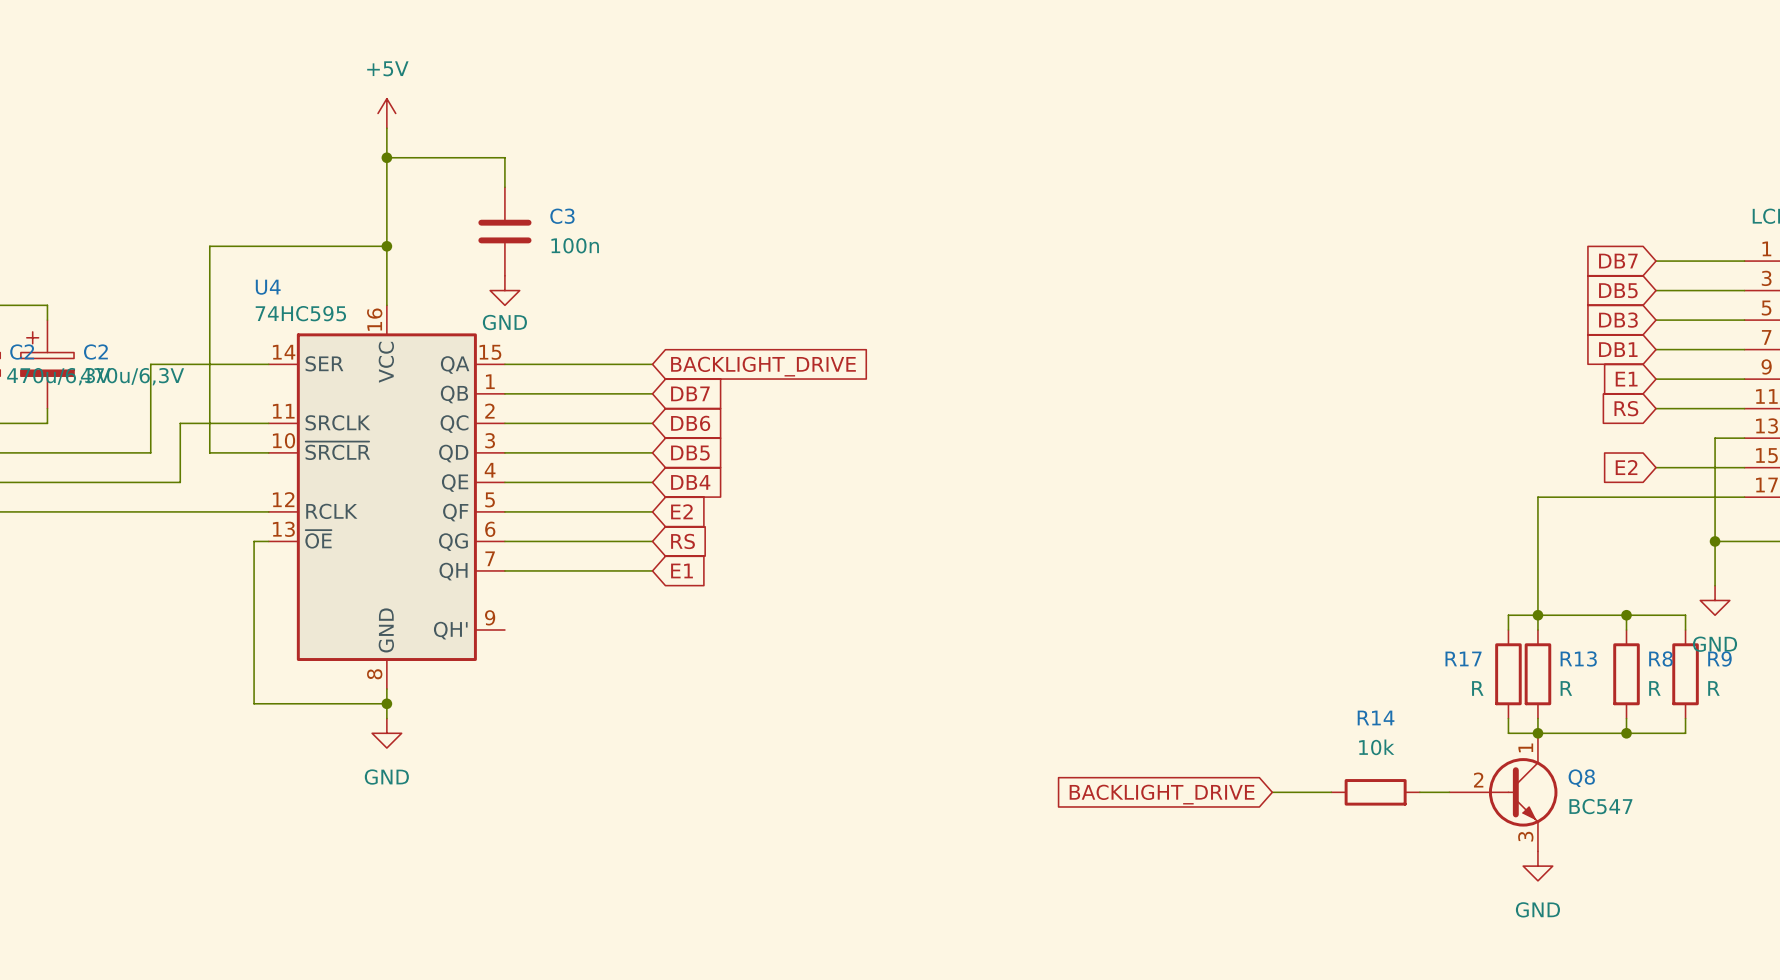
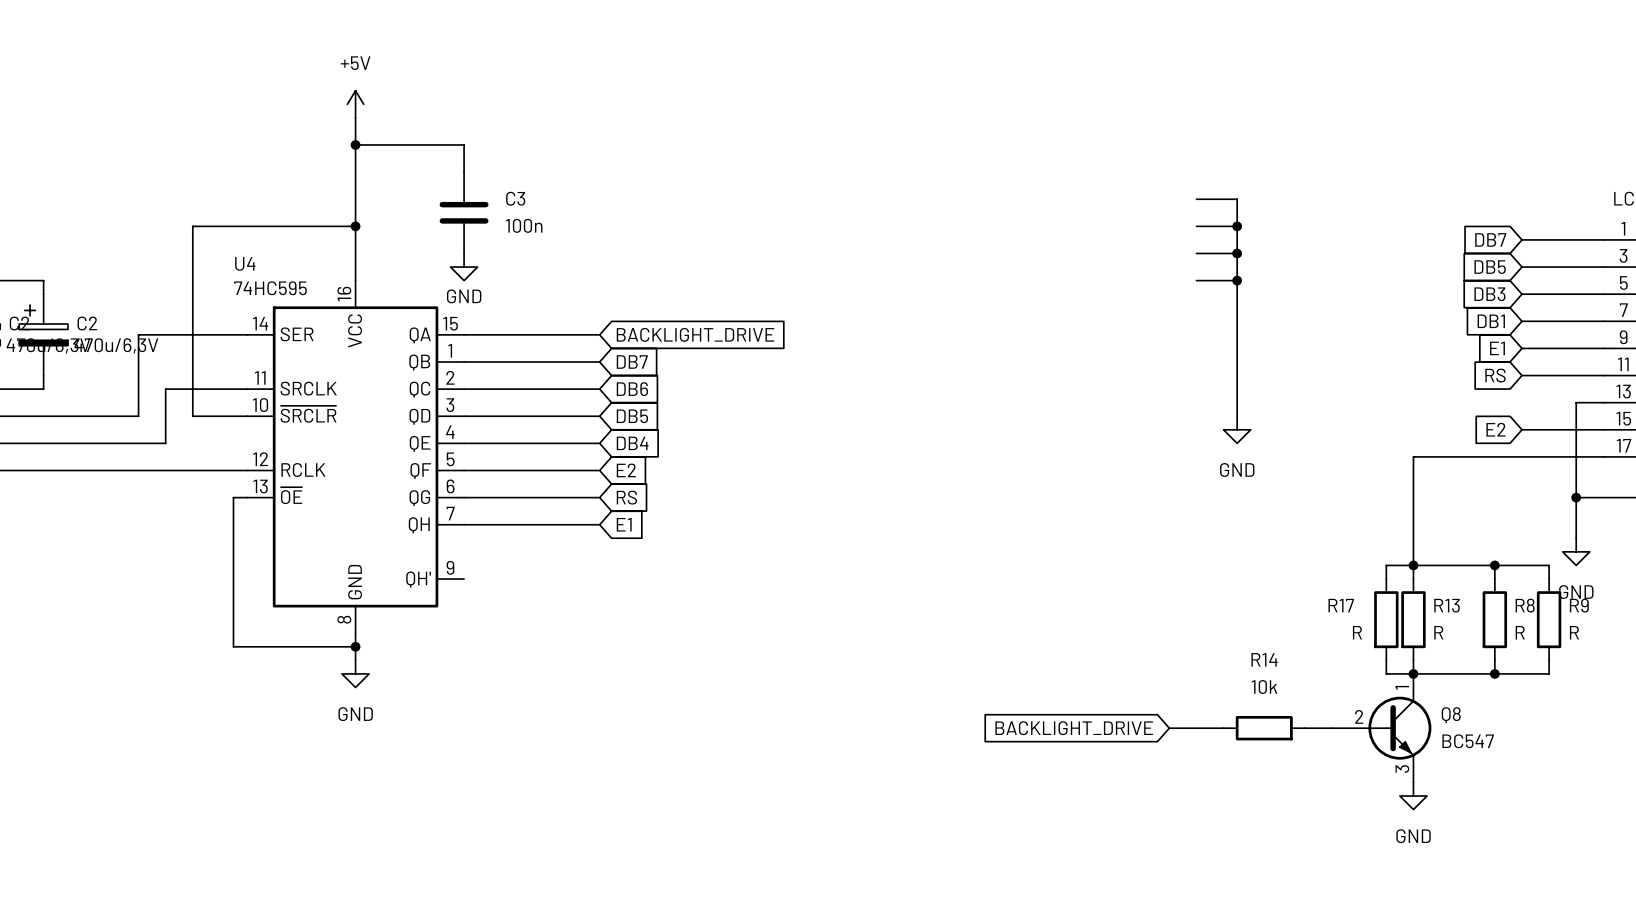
wire: none -> (1196, 199) (1237, 199) (1237, 416)
wire: none -> (1196, 226) (1237, 226)
junction: none -> (1237, 226)
wire: none -> (1196, 253) (1237, 253)
junction: none -> (1237, 253)
wire: none -> (1196, 280) (1237, 280)
junction: none -> (1237, 280)
power symbol: none -> GND (1237, 429)

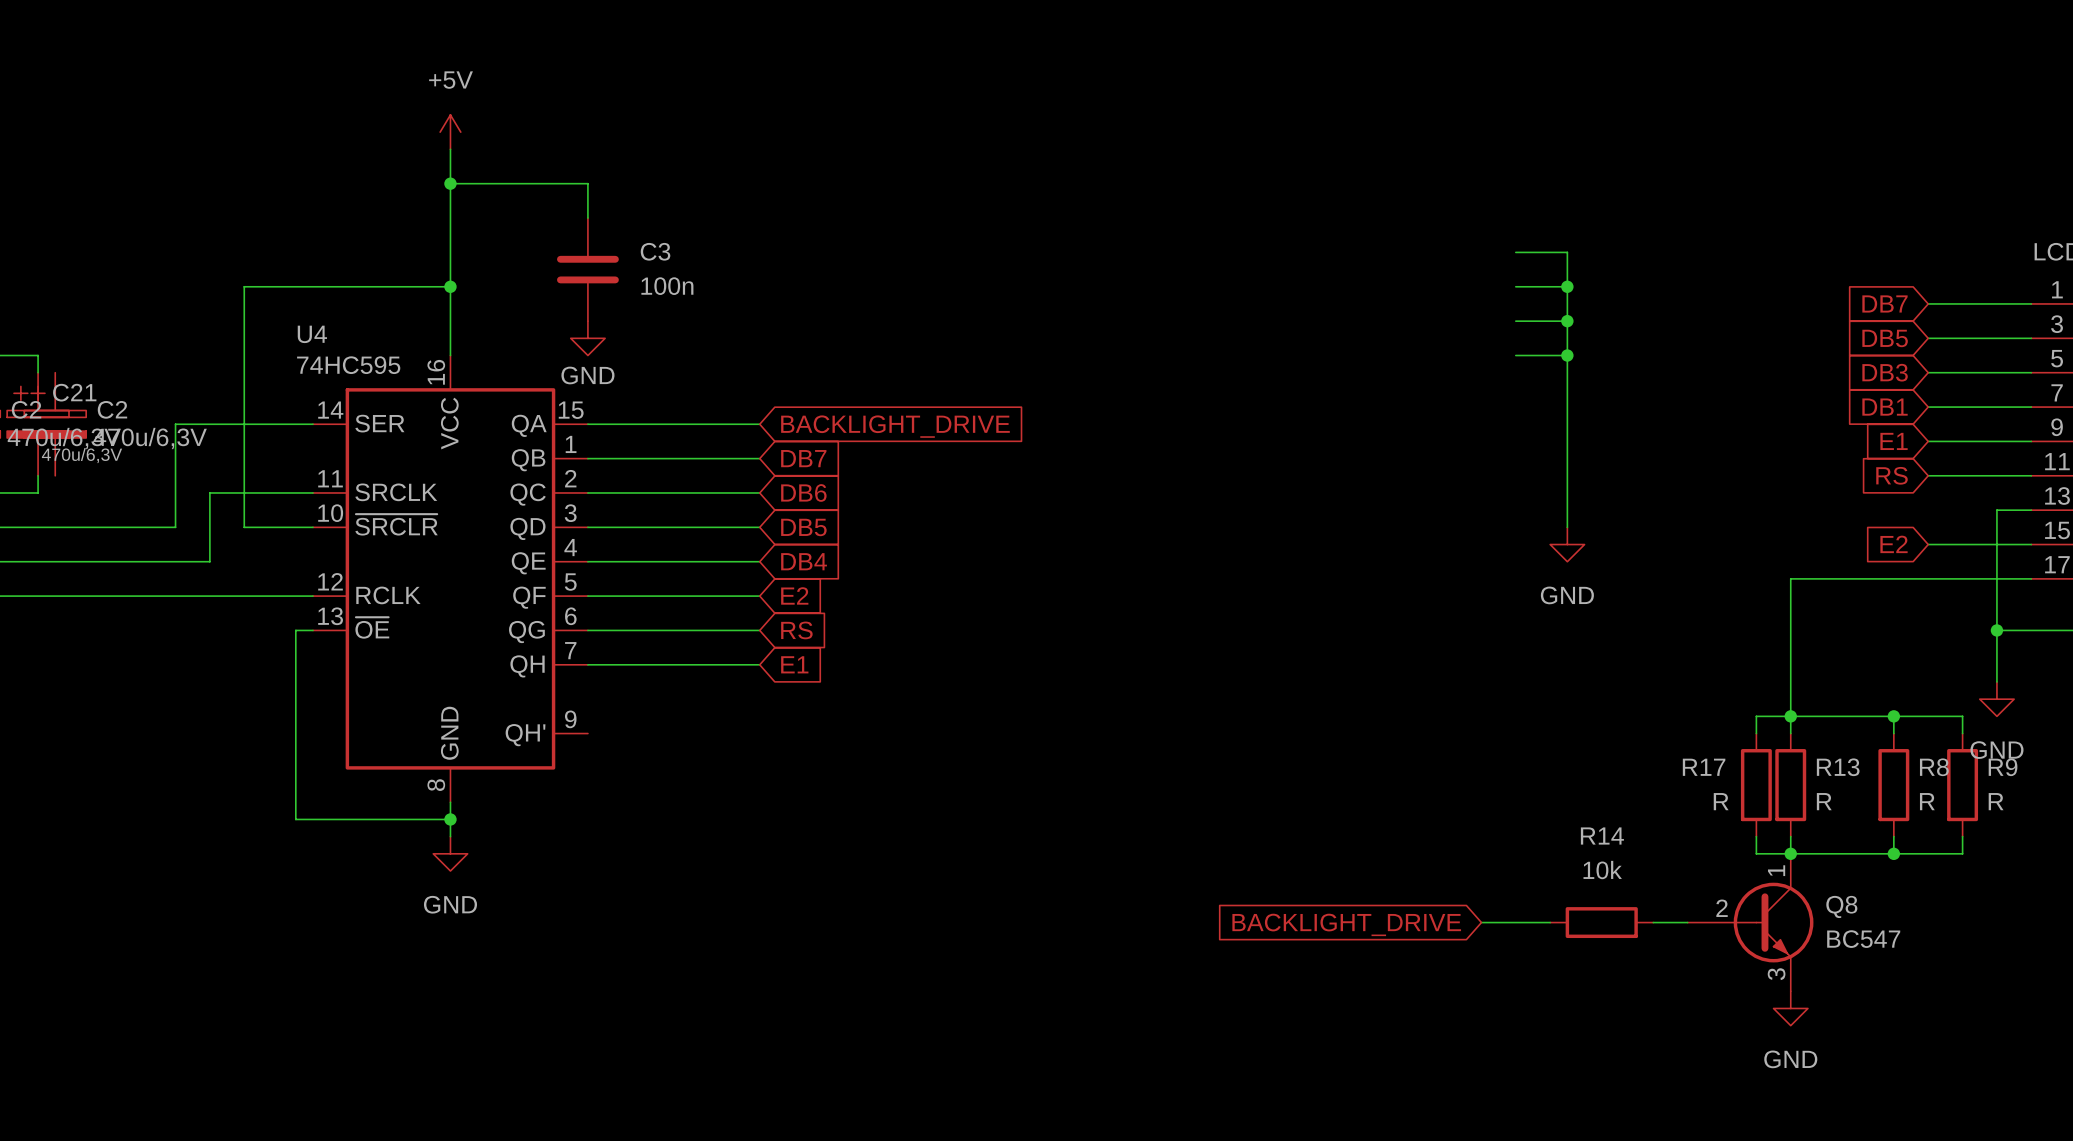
wire: (30, 280) (43, 280) (43, 294) -> (38, 355) (38, 372)
C21: none -> 470u/6,3V (38, 424)
wire: (43, 375) (43, 389) (30, 389) -> (38, 475) (38, 492)

